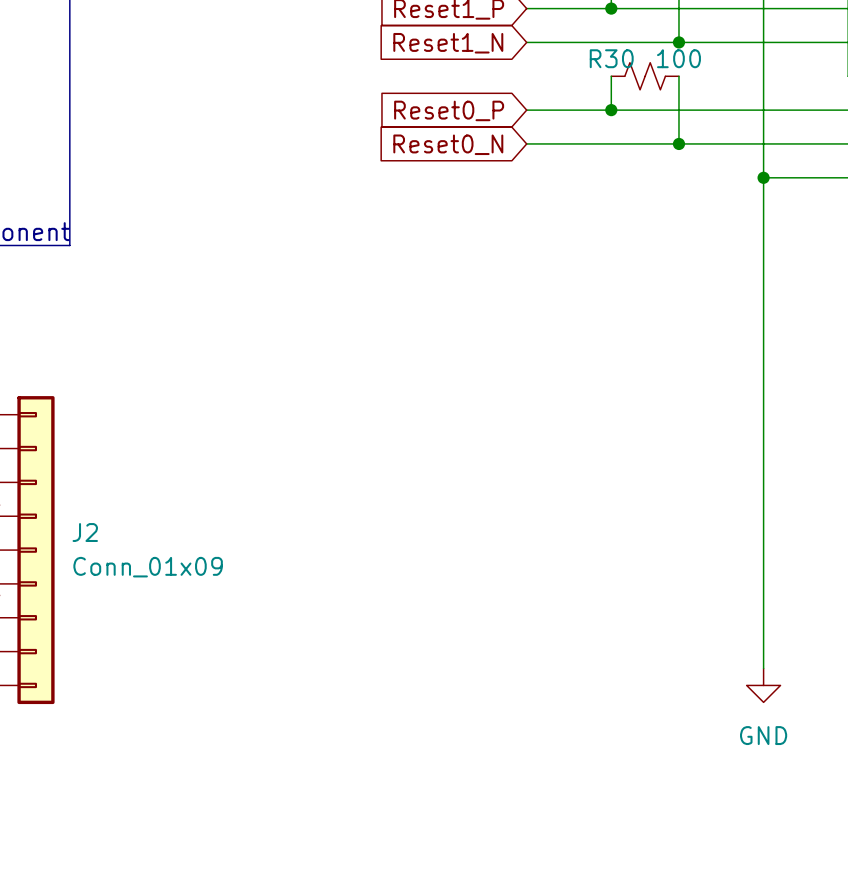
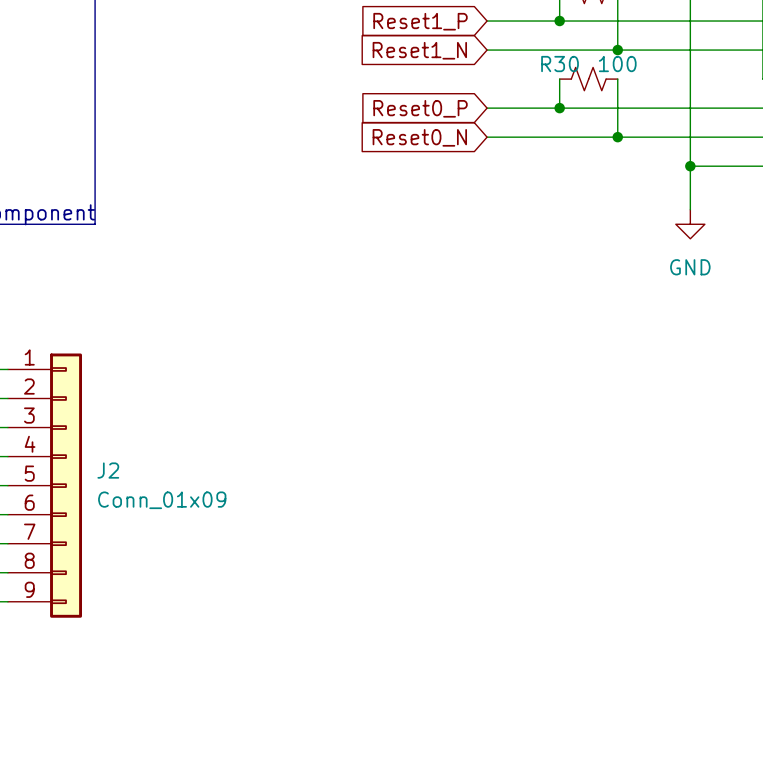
wire: (763, 228) (763, 668) -> none
power symbol: none -> GND (690, 224)
power symbol: GND (763, 685) -> none

